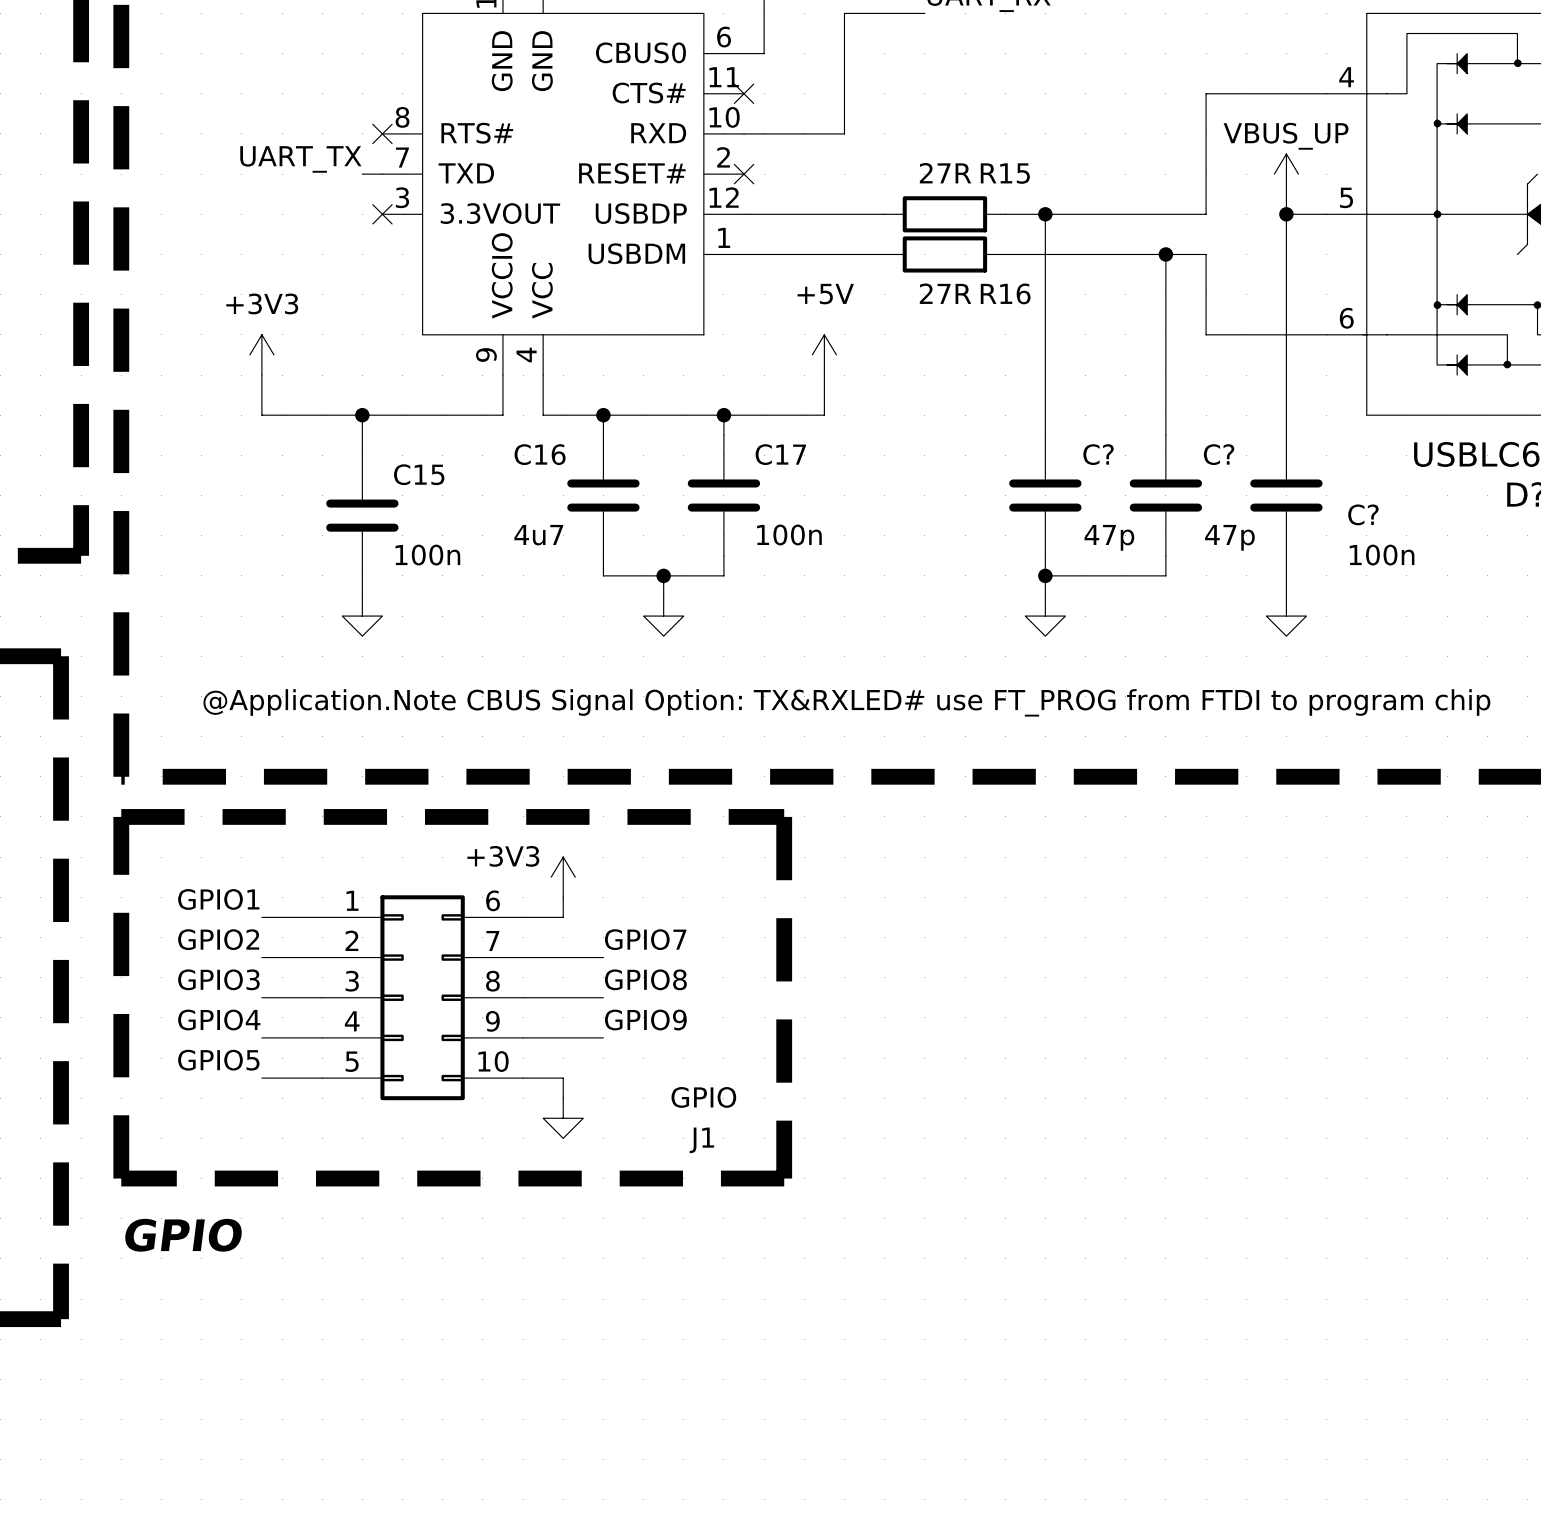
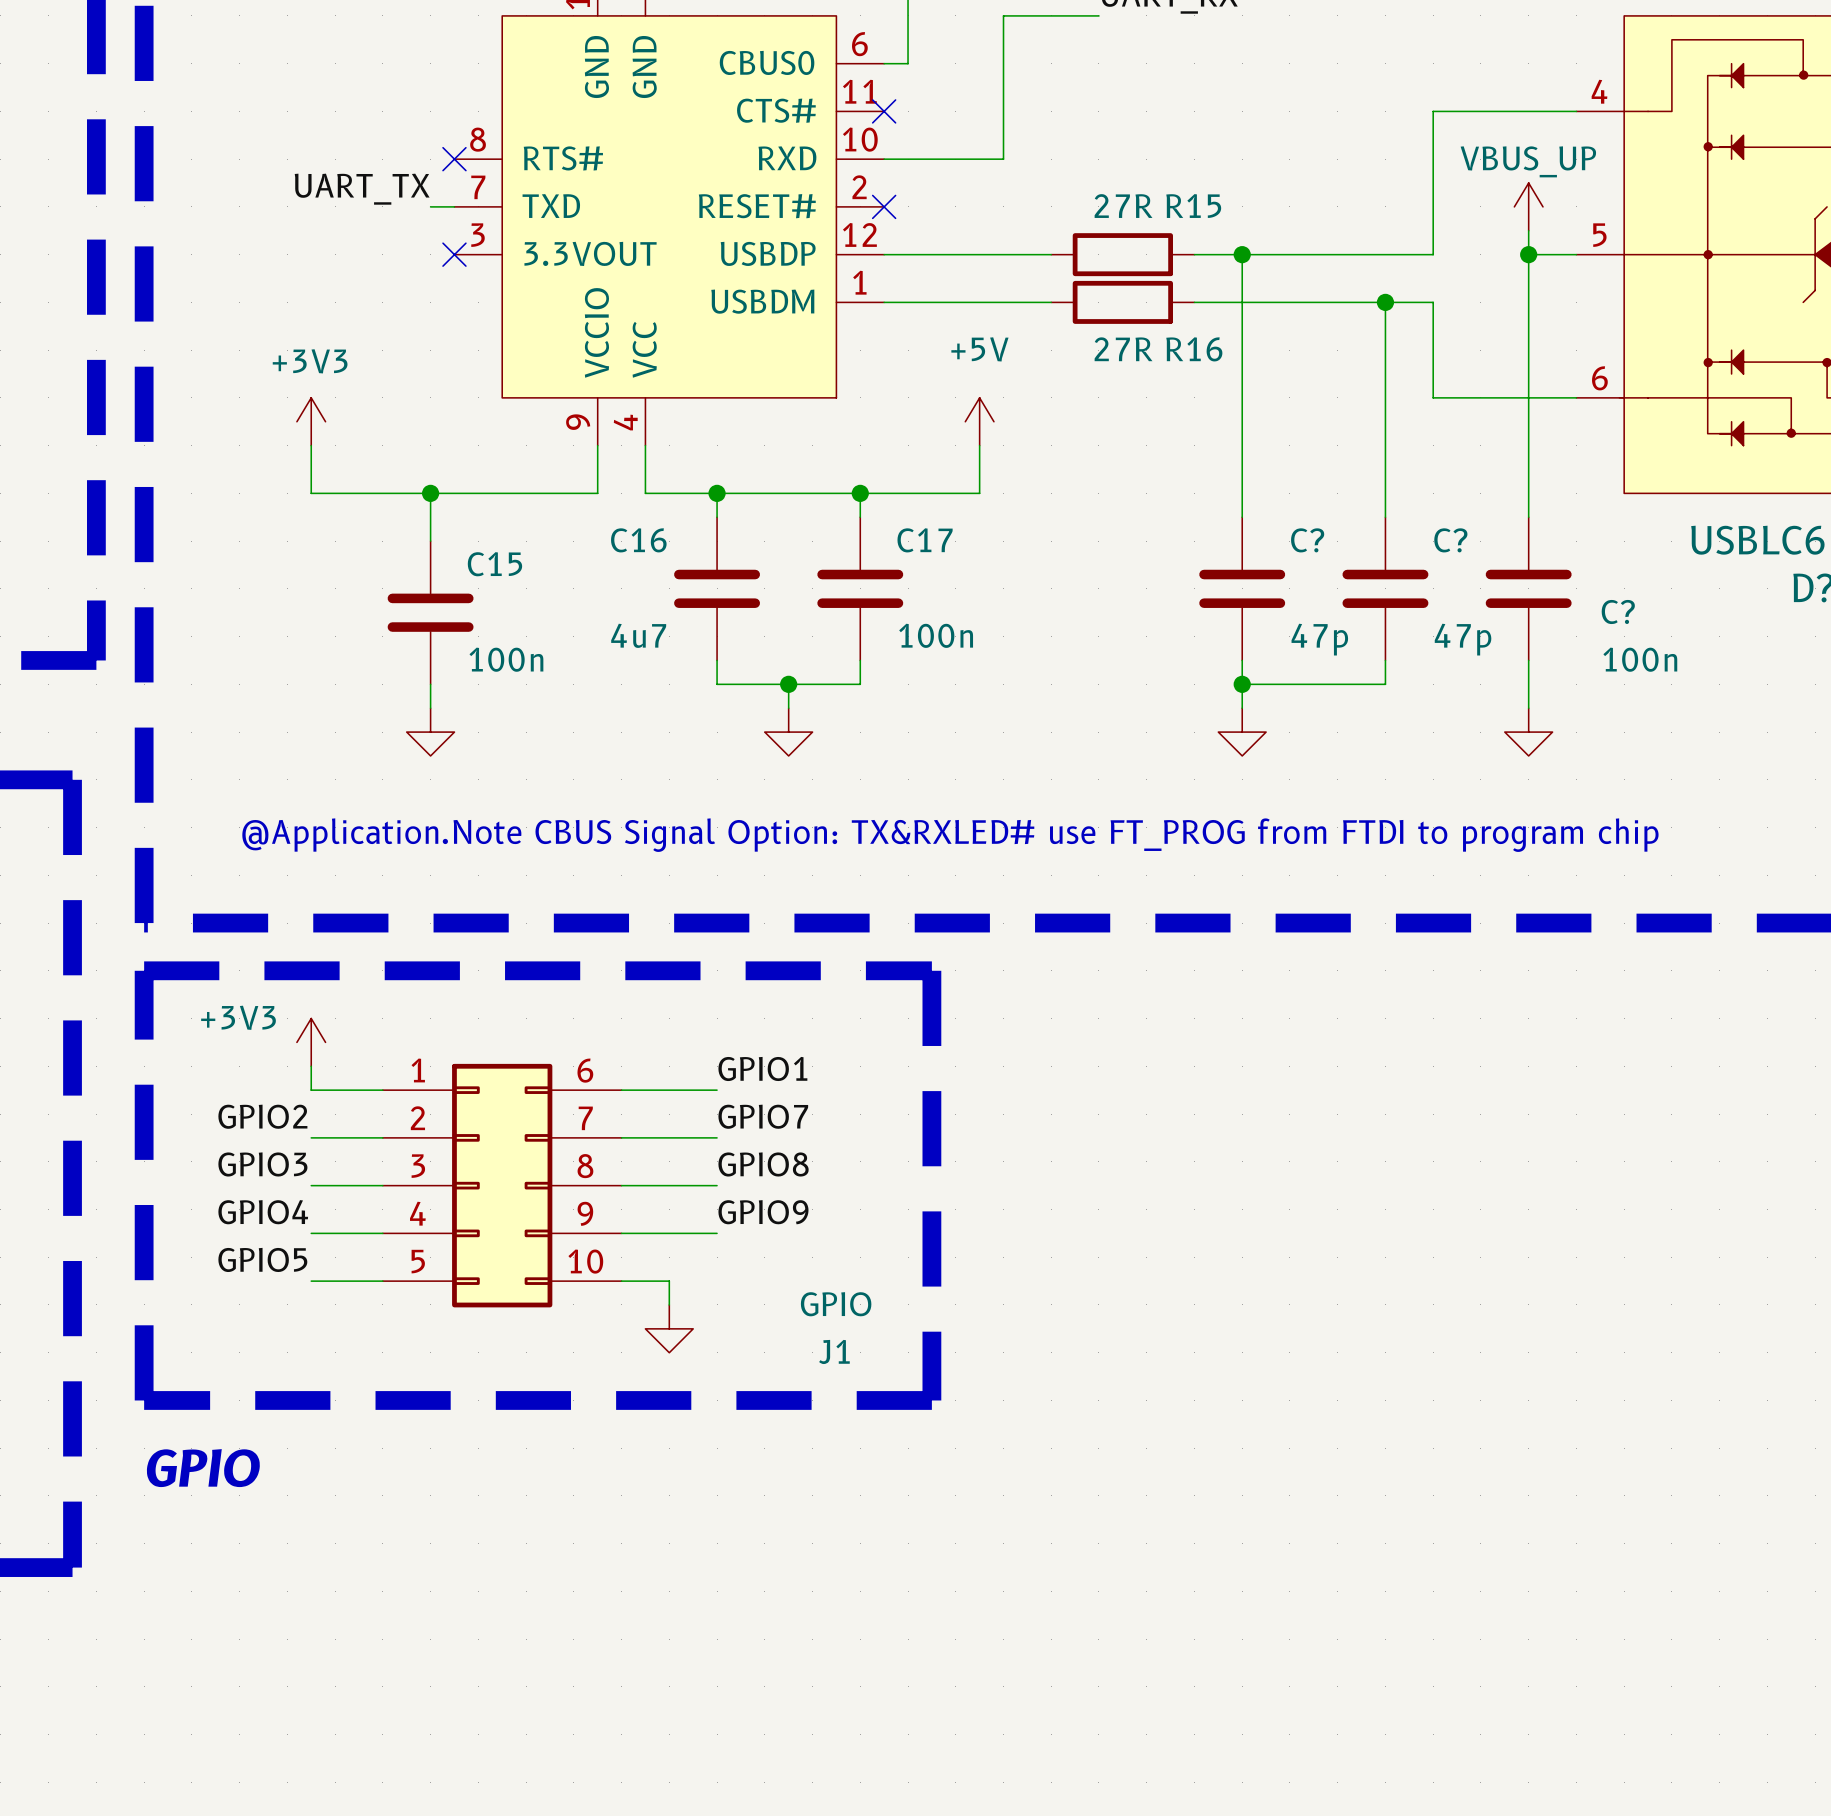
power symbol position: +3V3 (563, 877) -> +3V3 (311, 1042)
wire: none -> (311, 1066) (311, 1090)
wire: (563, 897) (563, 917) -> (717, 1090) (669, 1090)
label position: GPIO1 (218, 899) -> GPIO1 (762, 1068)

